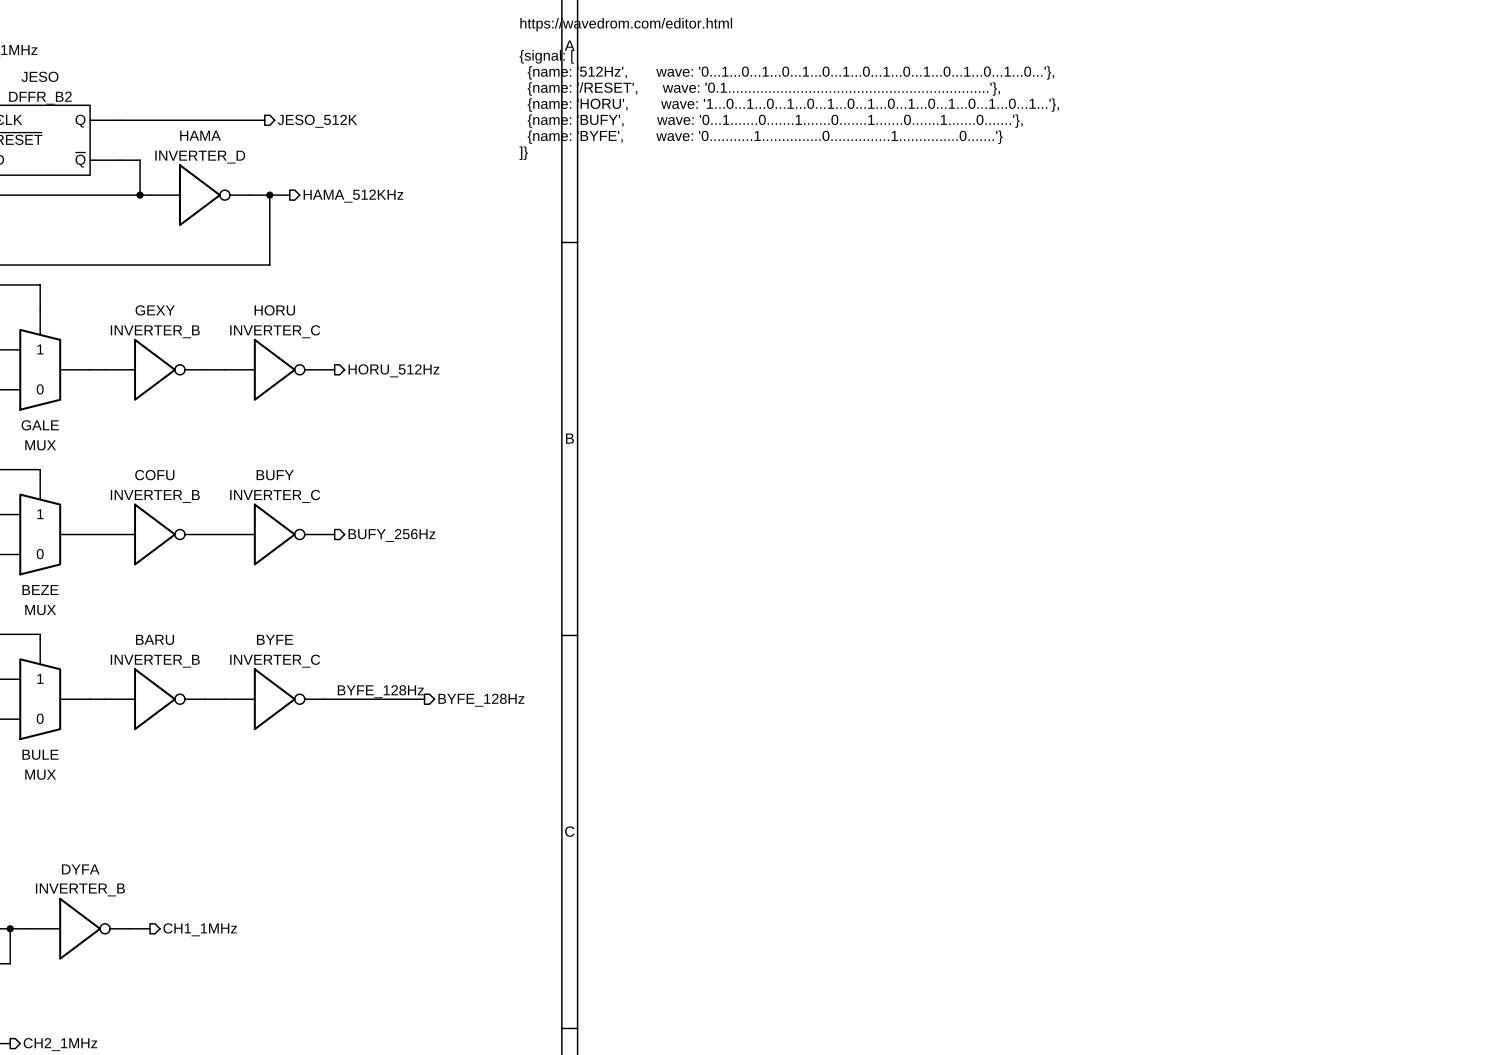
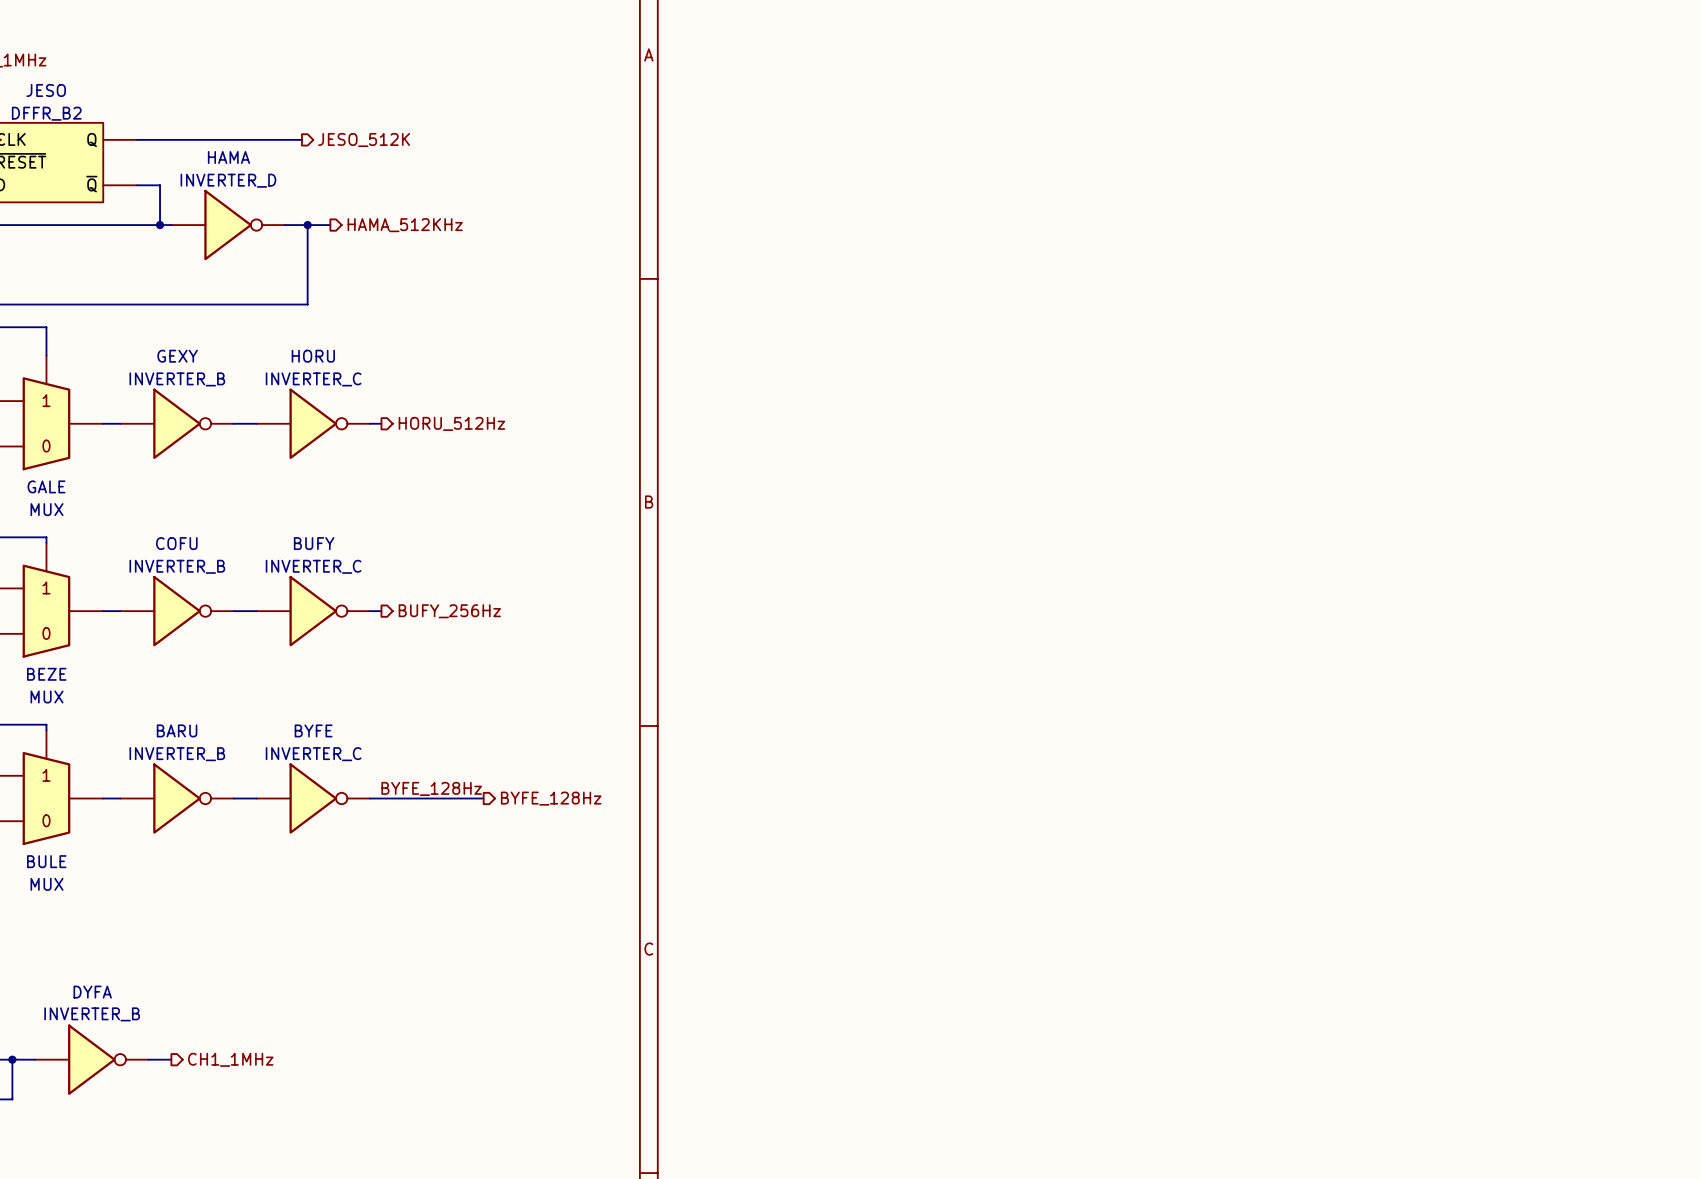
text: https://wavedrom.com/editor.html (626, 24) -> none
text: {signal: [ (546, 56) -> none
text: {name: '512Hz', wave: '0...1...0...1...0...1...0...1...0...1...0...1...0...1...0...1...0...'}, (790, 72) -> none
text: {name: '/RESET', wave: '0.1.................................................................'}, (763, 88) -> none
text: {name: 'HORU', wave: '1...0...1...0...1...0...1...0...1...0...1...0...1...0...1...0...1...'}, (793, 105) -> none
text: {name: 'BUFY', wave: '0...1.......0.......1.......0.......1.......0.......1.......0.......'}, (775, 121) -> none
text: {name: 'BYFE', wave: '0...........1...............0...............1...............0.......'} (765, 137) -> none
text: ]} (523, 153) -> none

